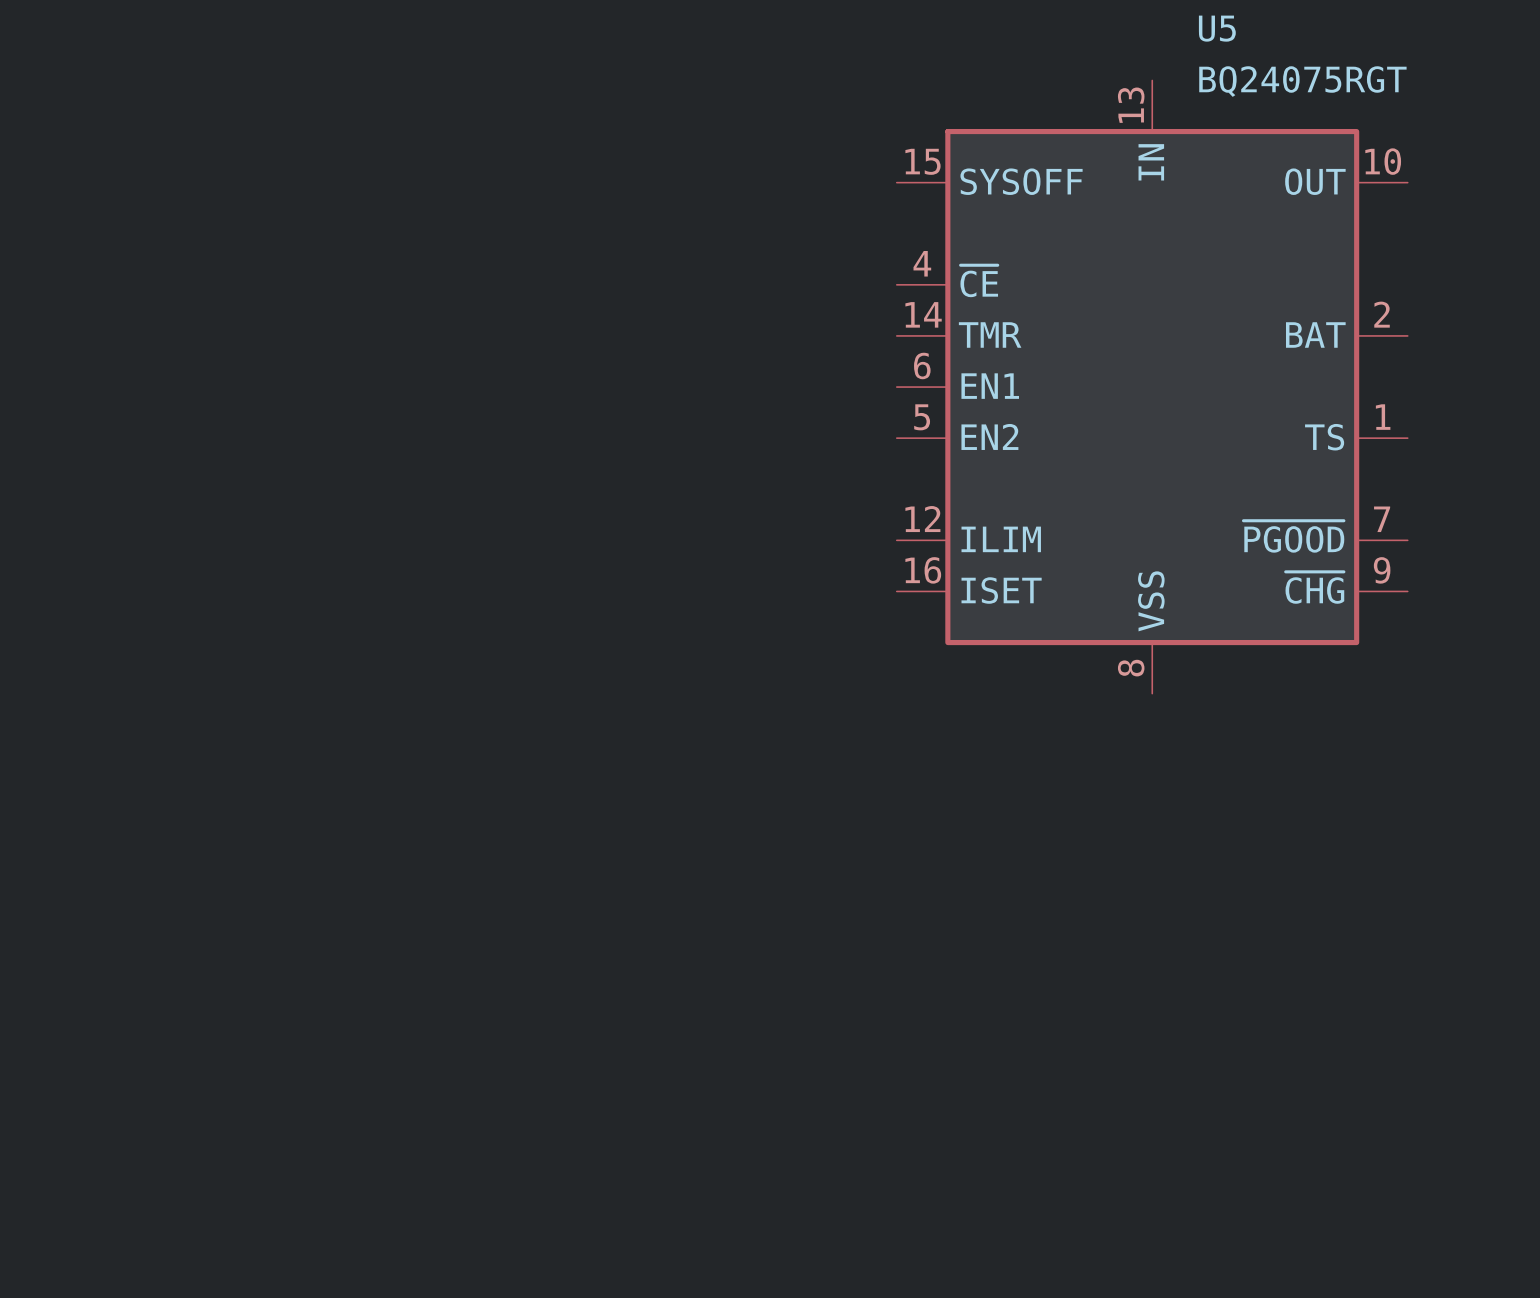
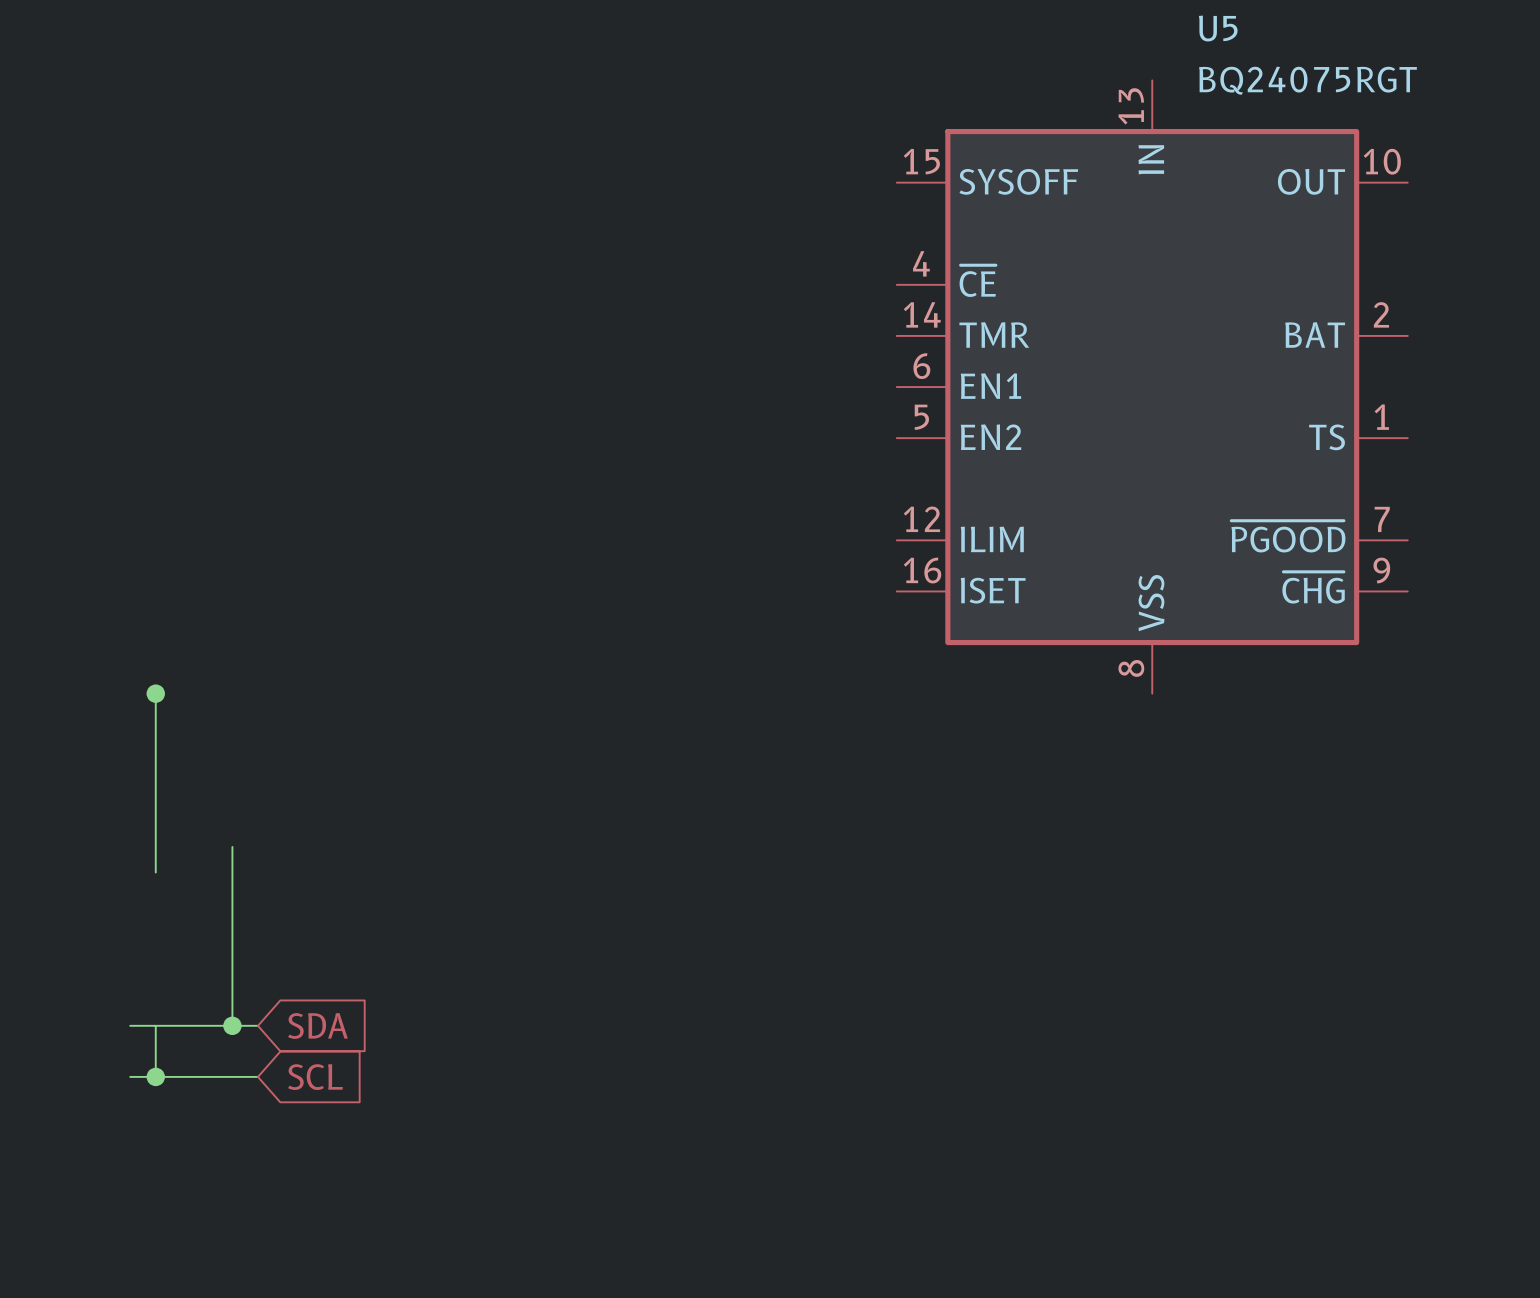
wire: none -> (155, 693) (155, 872)
junction: none -> (155, 693)
wire: none -> (232, 846) (232, 1025)
wire: none -> (130, 1025) (257, 1025)
wire: none -> (155, 1025) (155, 1076)
junction: none -> (232, 1025)
global label: none -> SDA (317, 1025)
wire: none -> (130, 1076) (257, 1076)
junction: none -> (155, 1076)
global label: none -> SCL (315, 1077)

